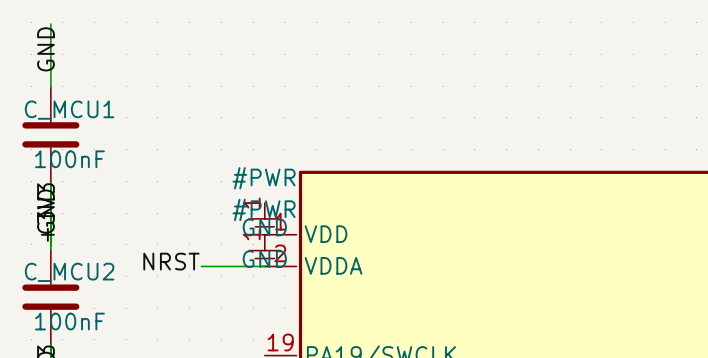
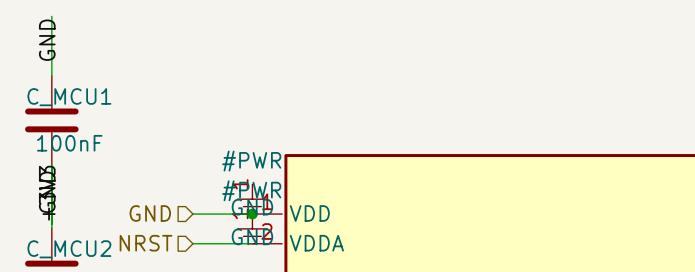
hierarchical label: none -> GND (150, 213)
wire: none -> (192, 214) (252, 214)
junction: none -> (252, 214)
label: NRST (171, 261) -> none
hierarchical label: none -> NRST (146, 243)

